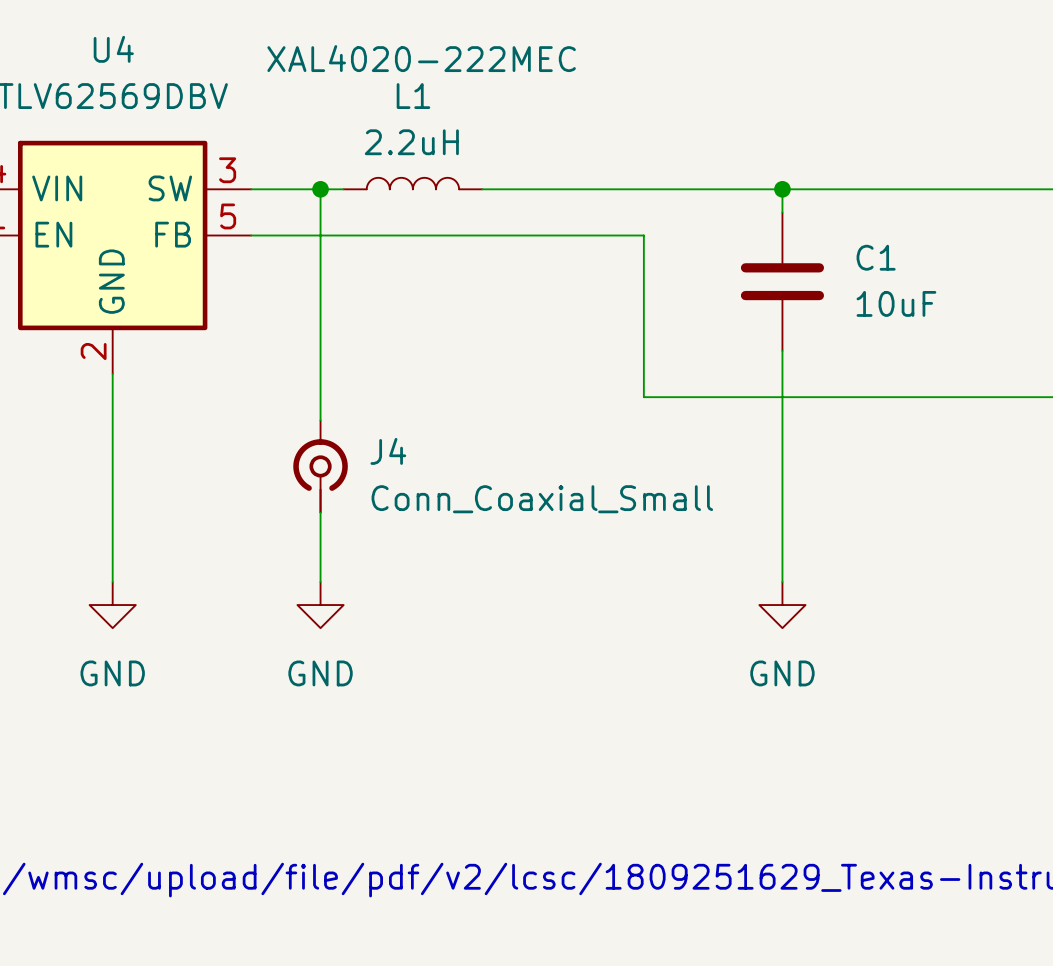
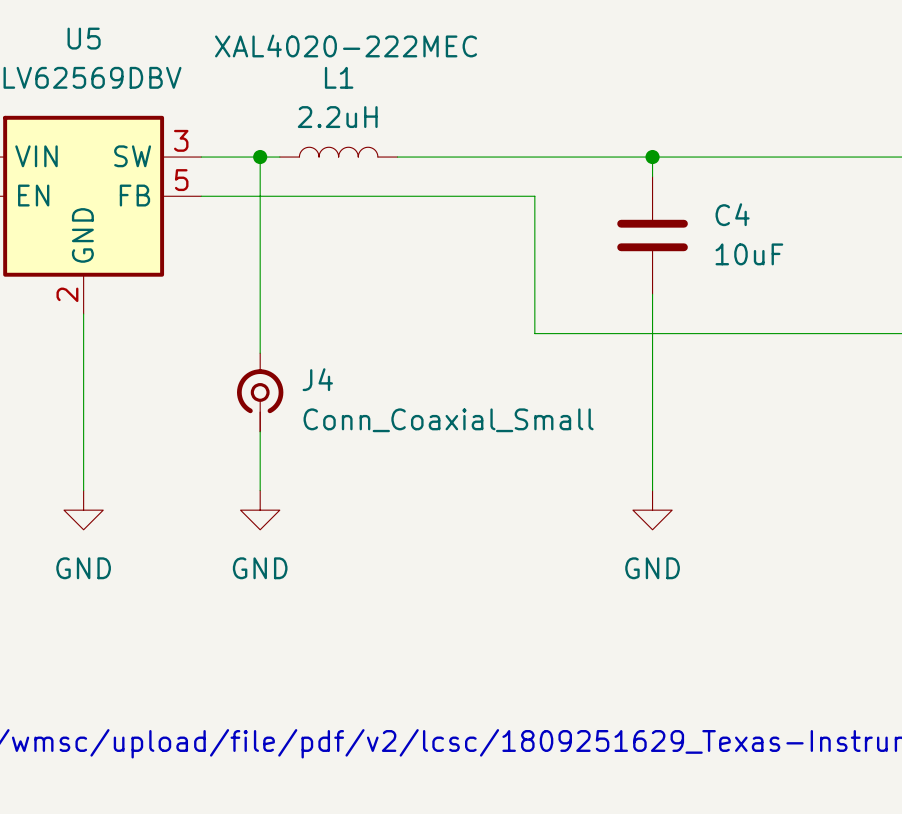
U4 name: U4 (113, 49) -> U5 (84, 38)
C1 name: C1 (876, 257) -> C4 (732, 214)

